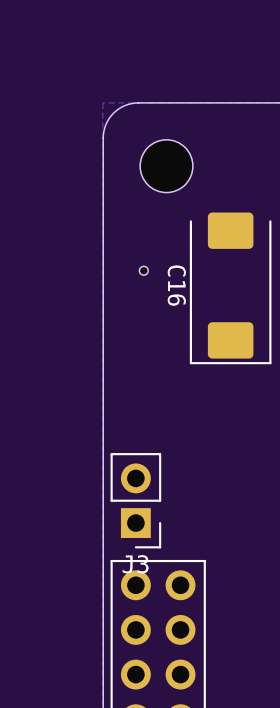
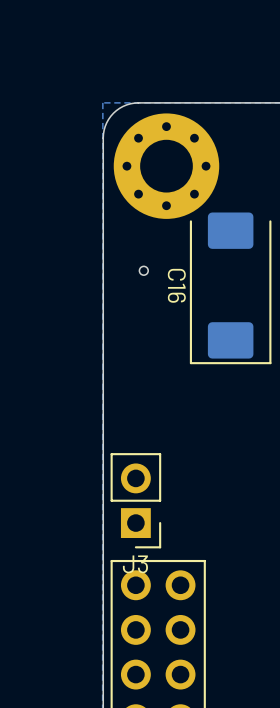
part footprint: [140, 139, 193, 193] -> [113, 113, 220, 219]

